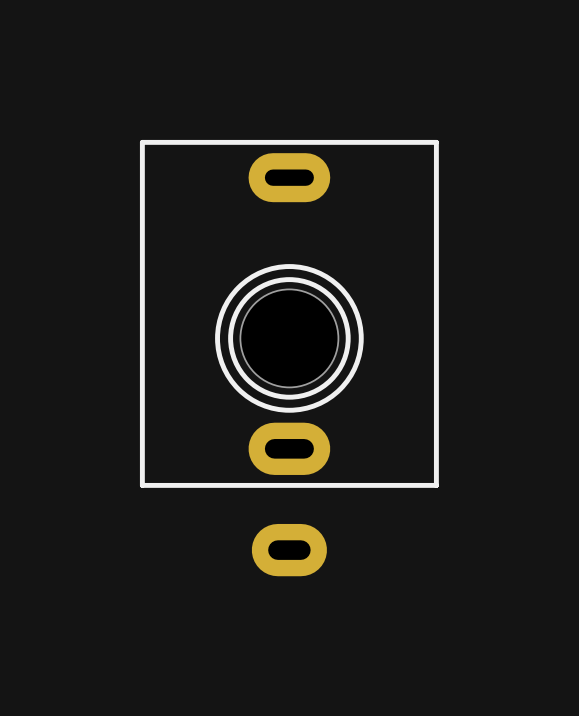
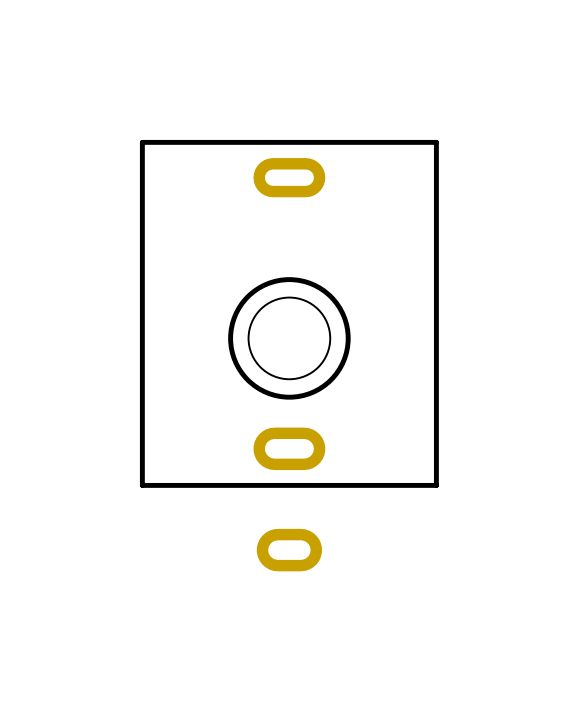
part footprint: [139, 139, 439, 577] -> [139, 139, 439, 572]

